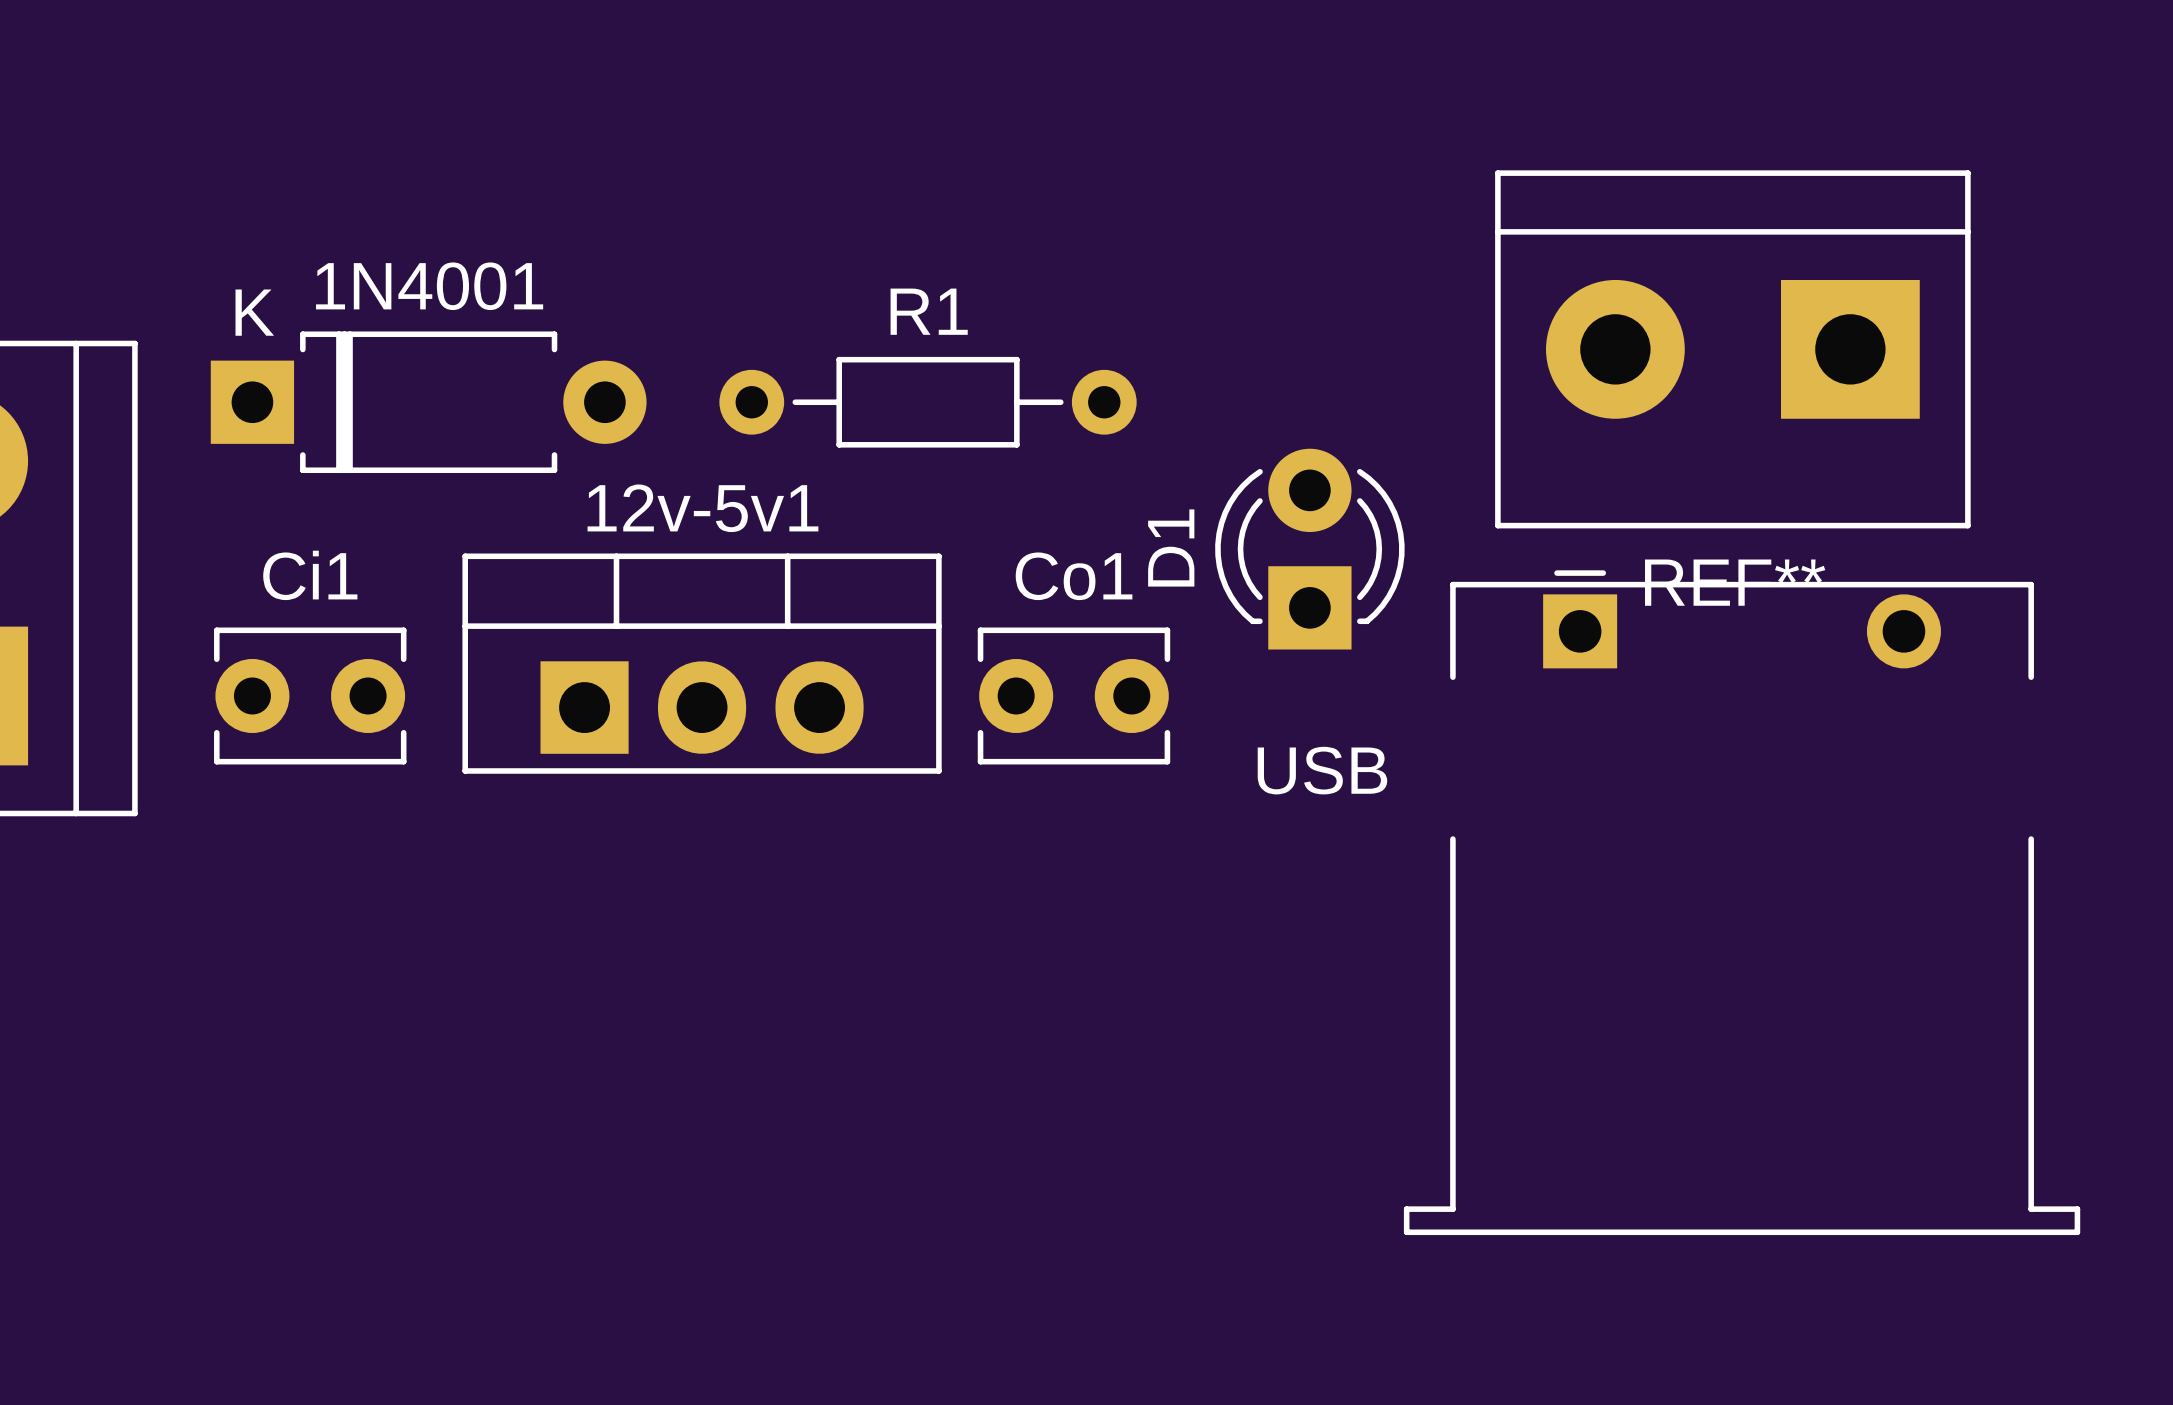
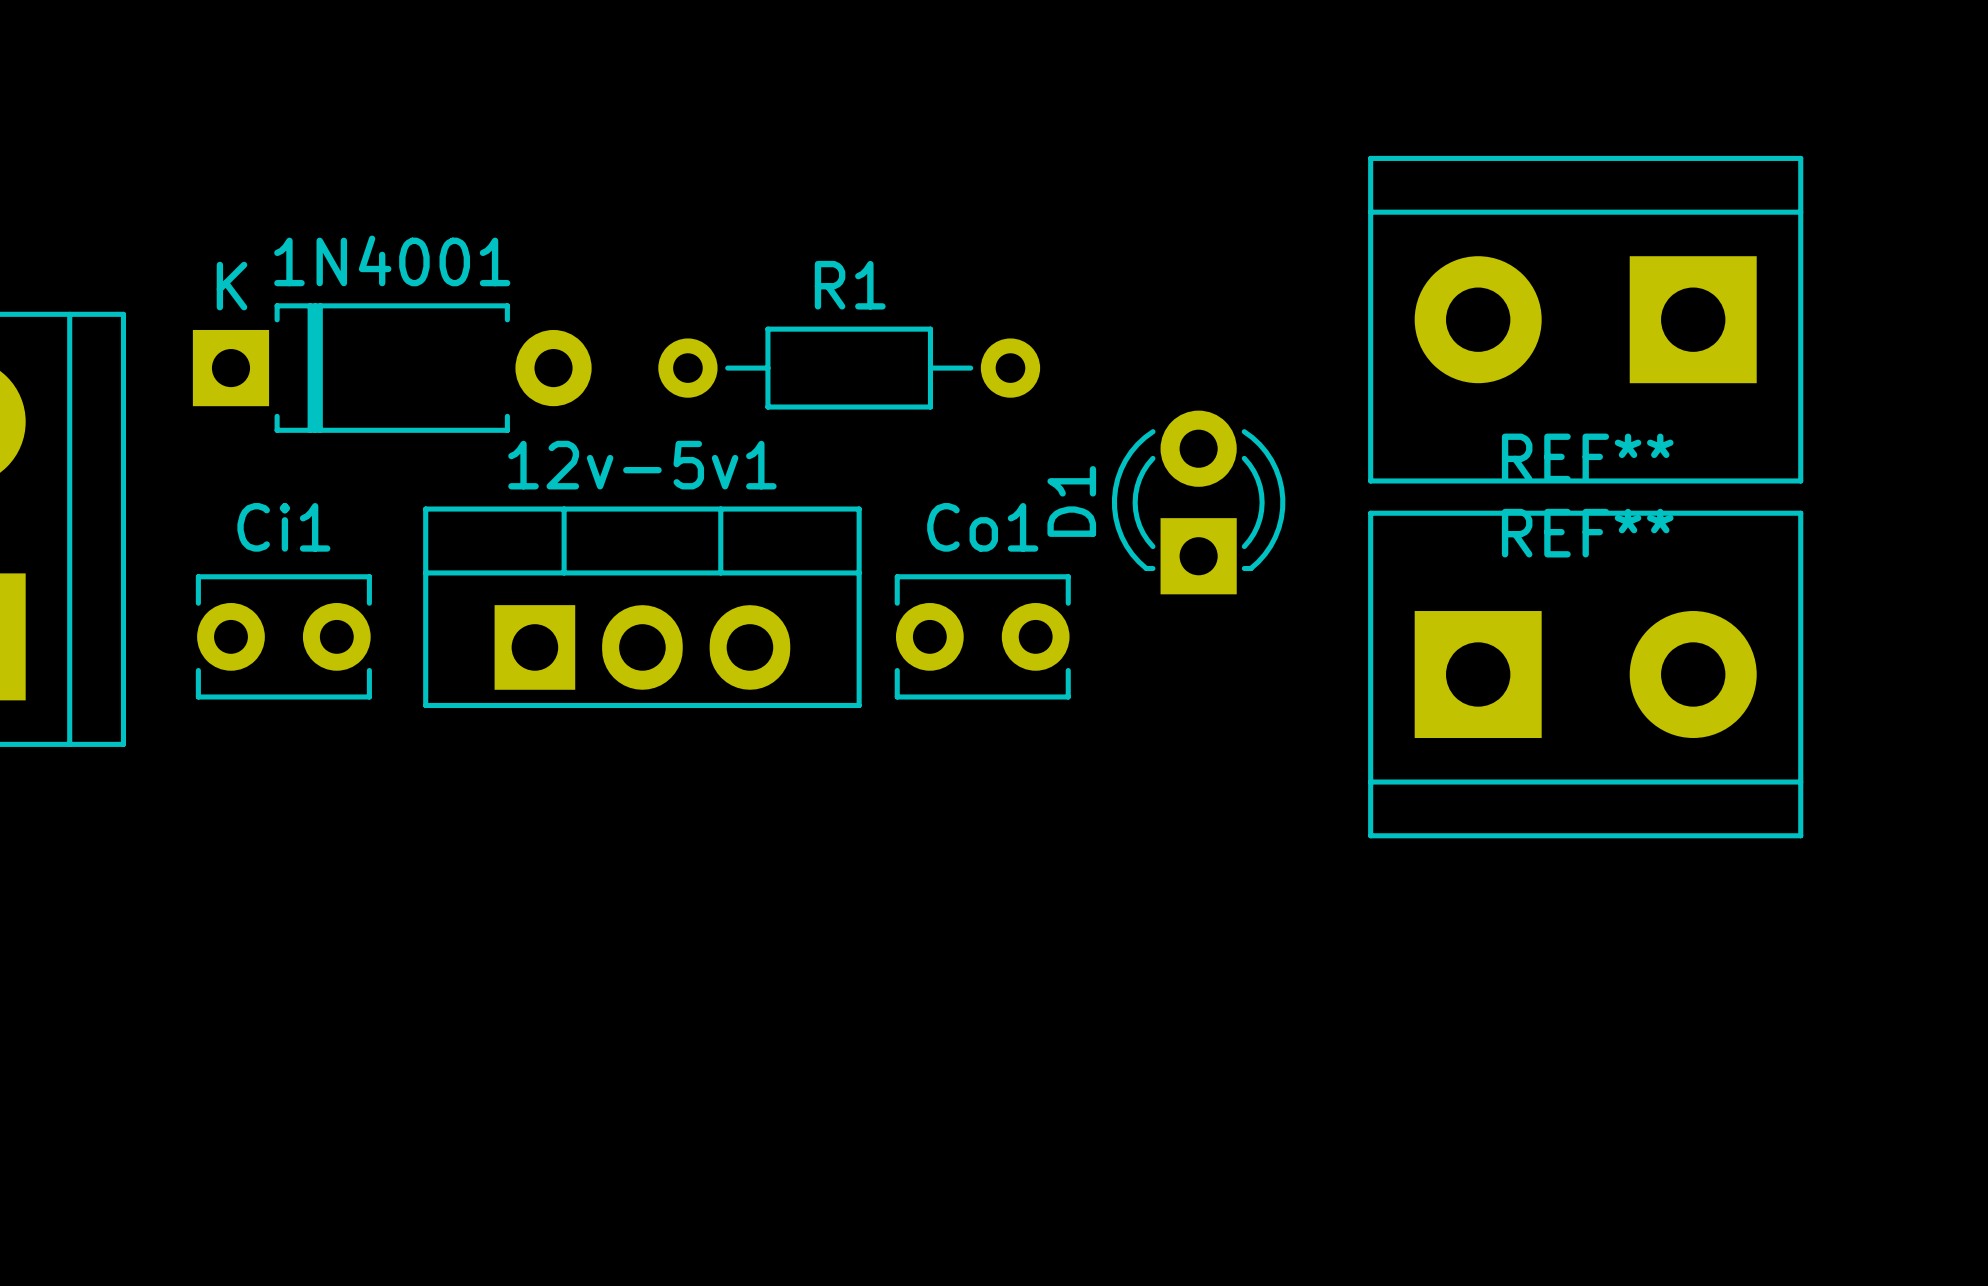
REF**: none -> (1585, 674)
USB: (1742, 902) -> none

